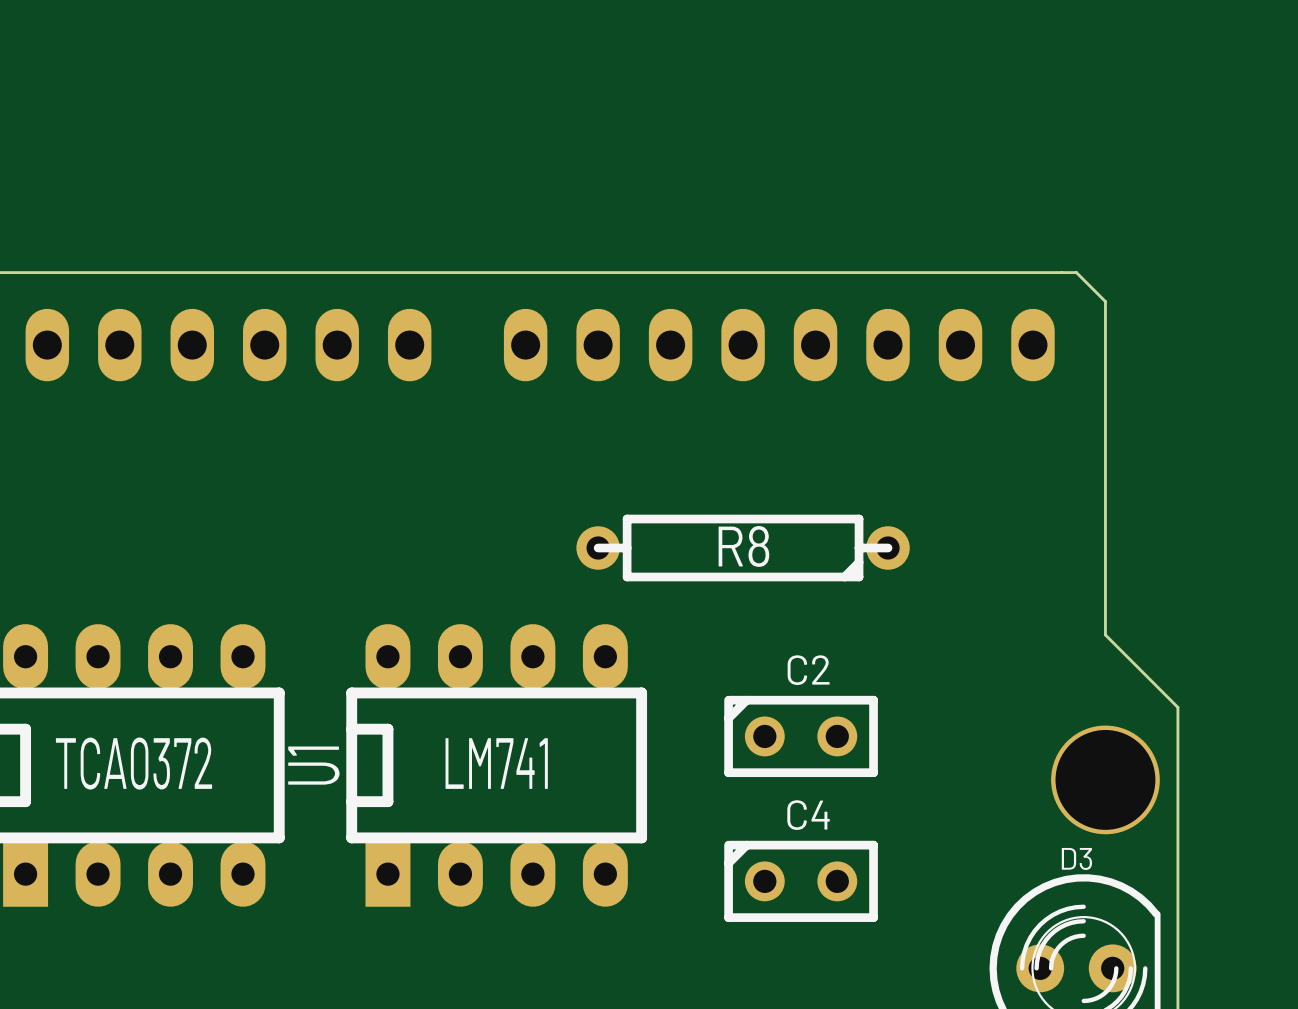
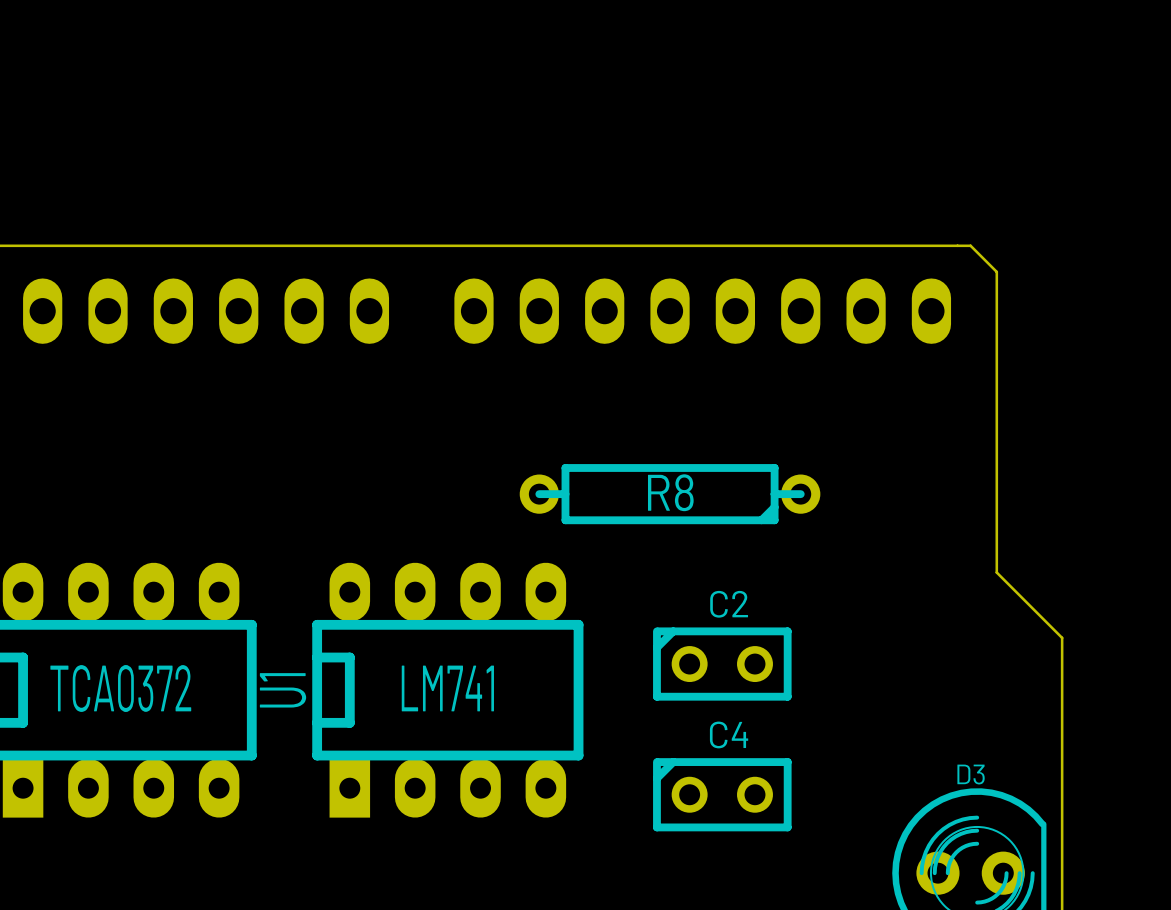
part: (1105, 779) -> none

